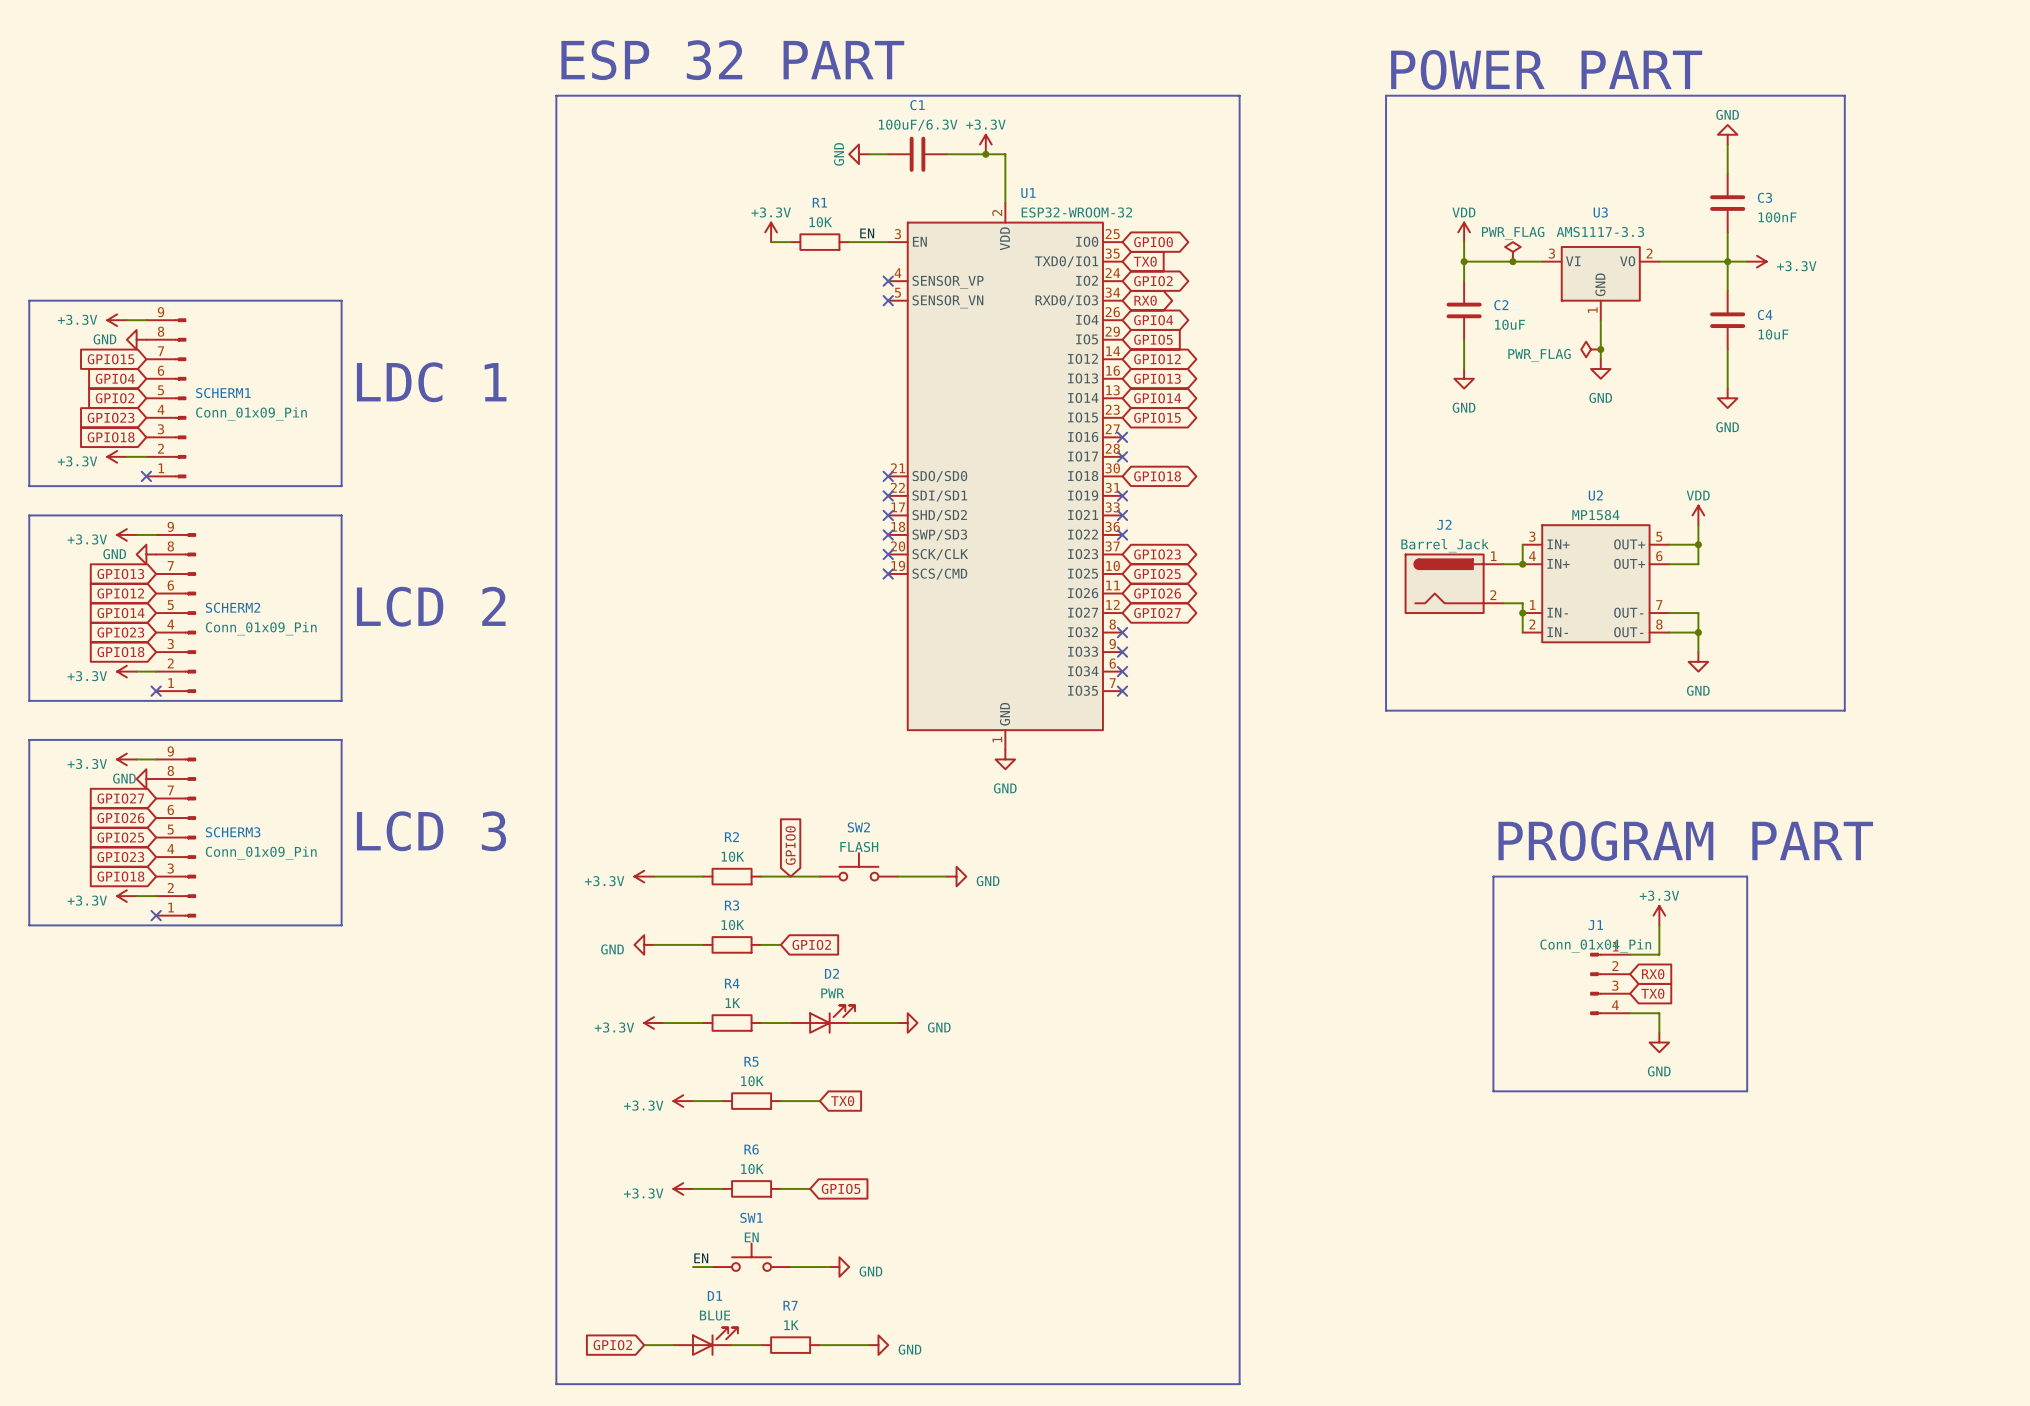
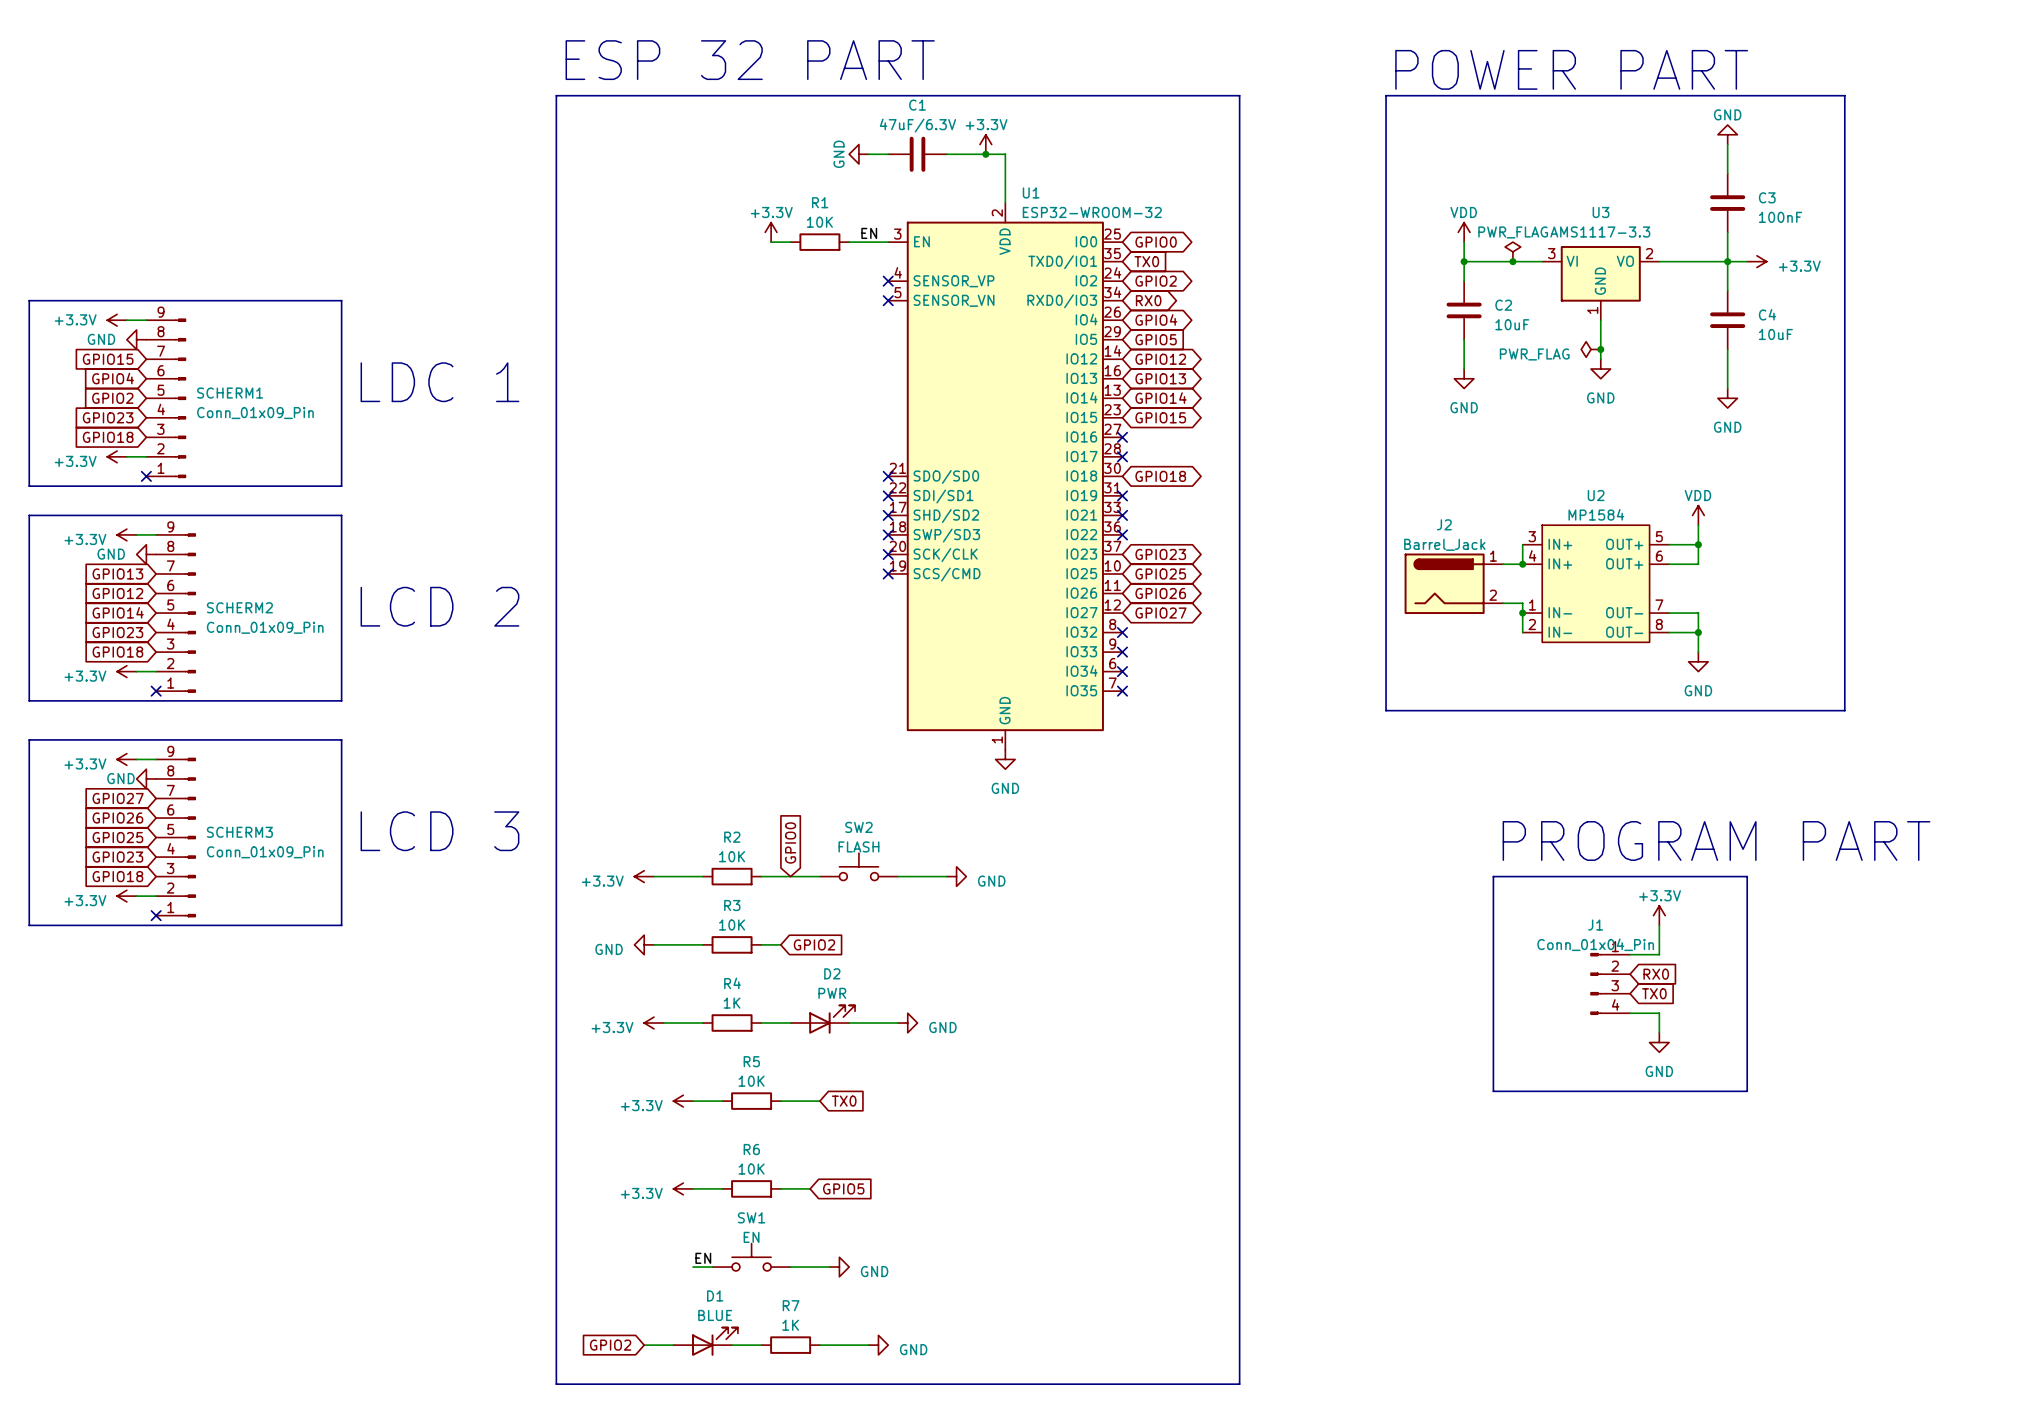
C1 value: 100uF/6.3V (918, 125) -> 47uF/6.3V (917, 125)

